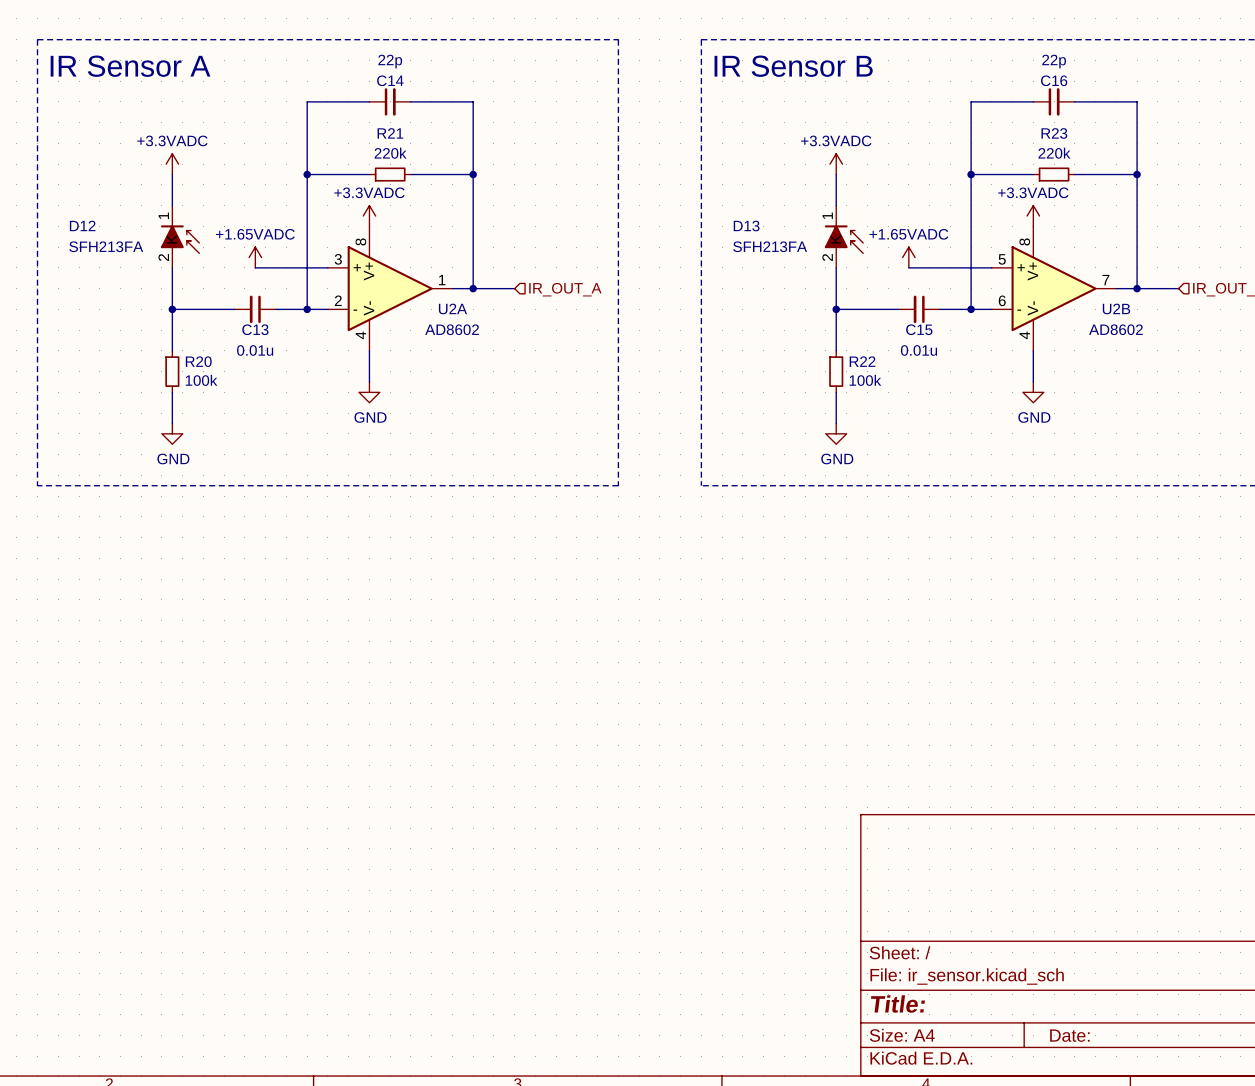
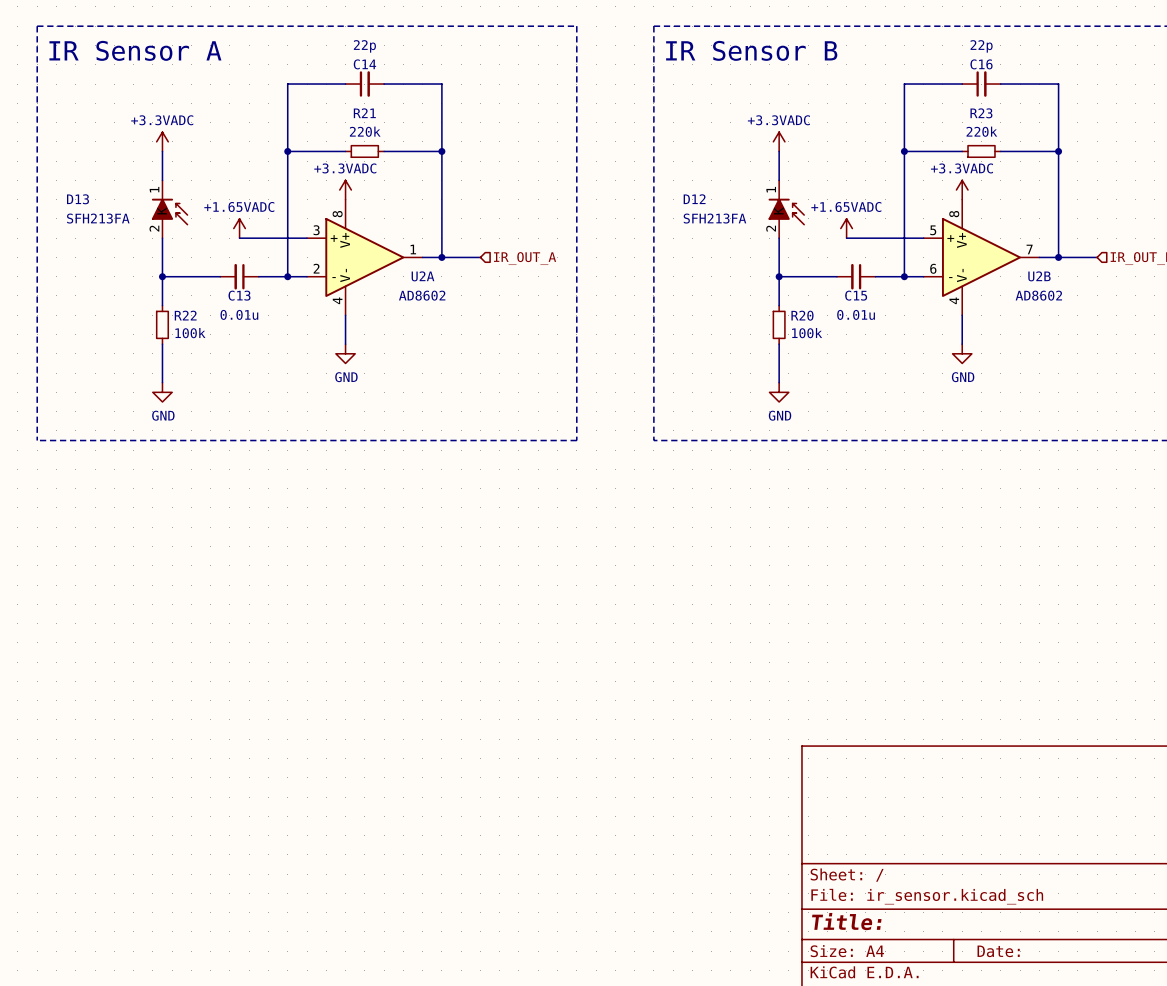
D12 name: D12 (82, 225) -> D13 (77, 199)
D13 name: D13 (746, 226) -> D12 (694, 199)
R20 position: (172, 371) -> (779, 324)
R22 position: (836, 371) -> (162, 324)

